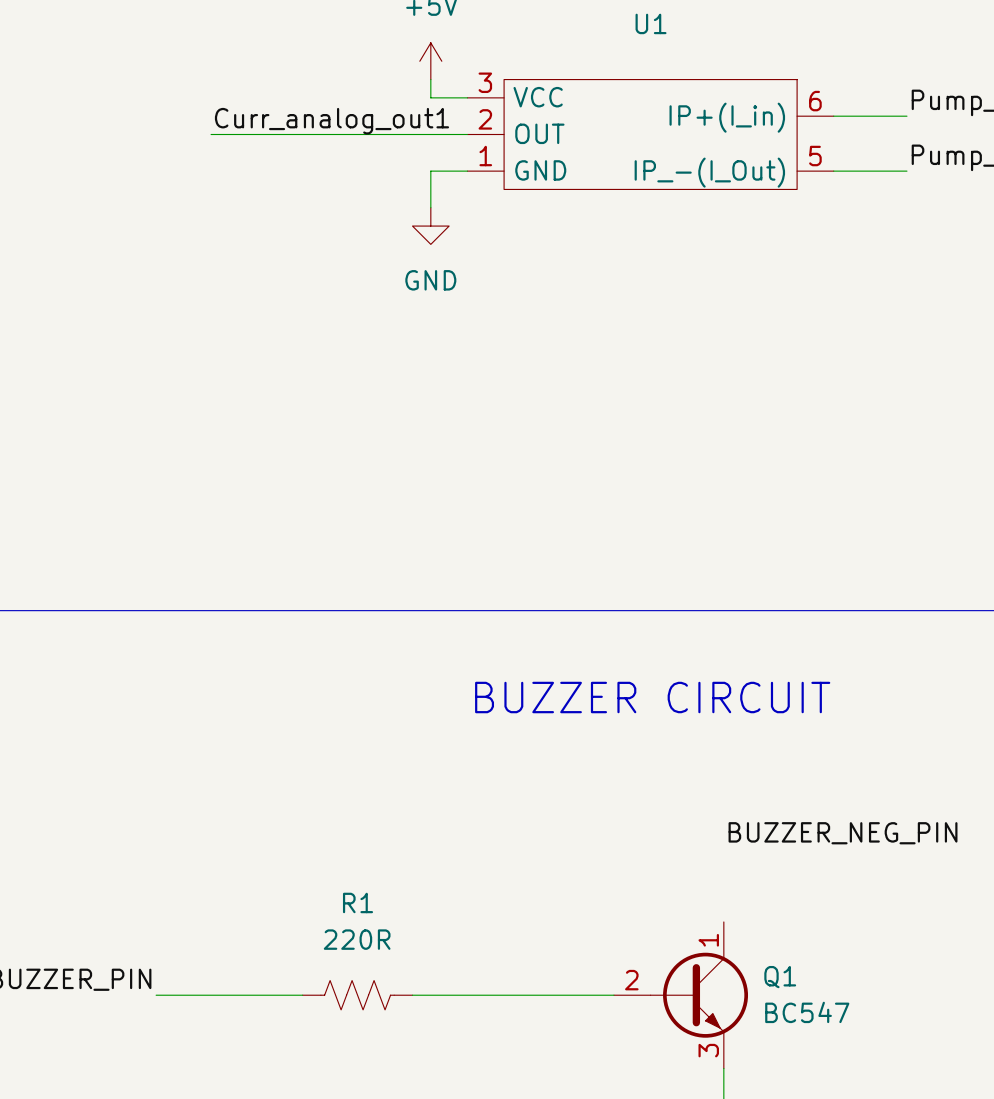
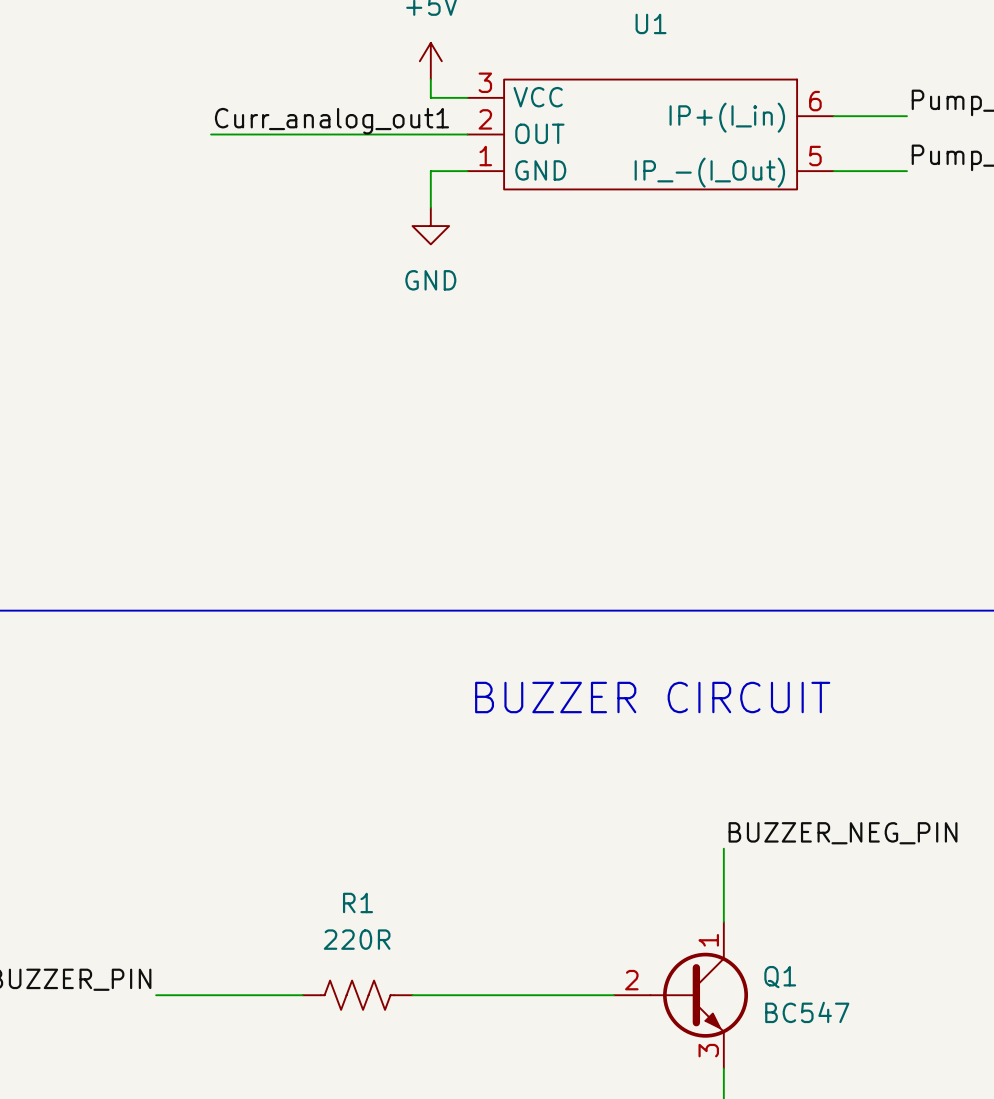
wire: none -> (723, 848) (723, 921)

